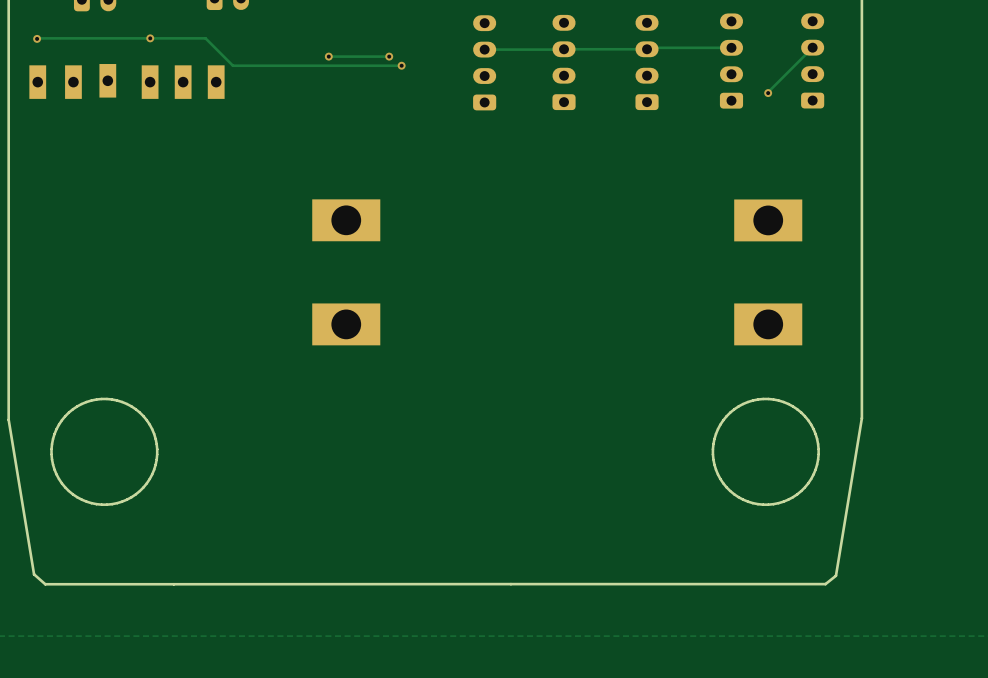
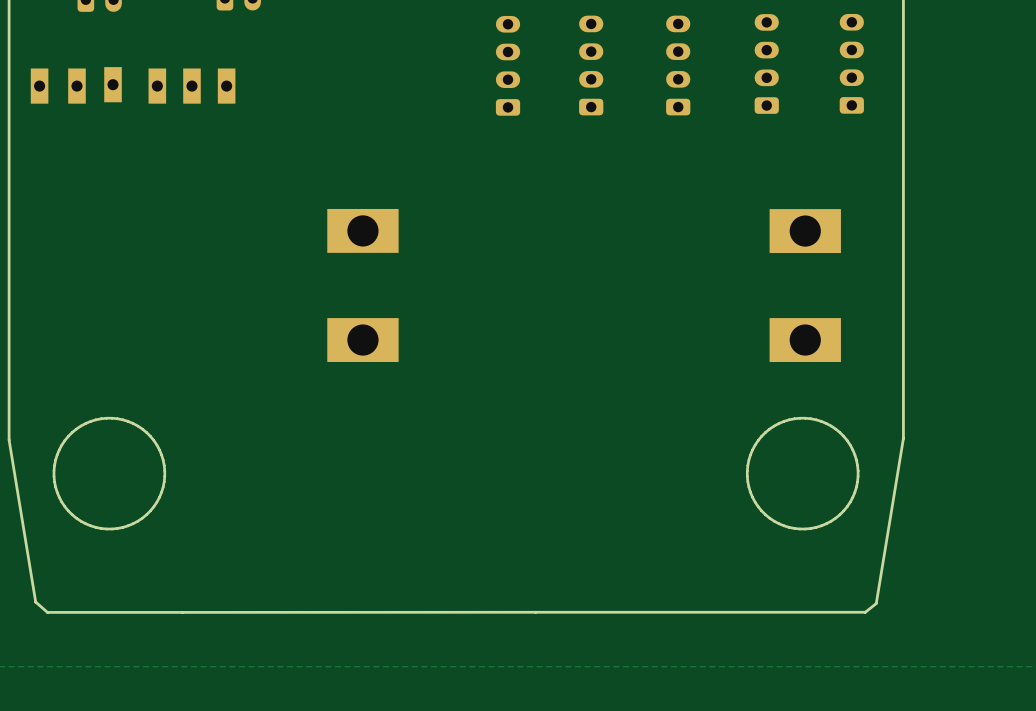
track: (37, 38) (205, 38) (232, 65) (401, 65) -> none
via: (37, 38) -> none
via: (150, 38) -> none
track: (731, 47) (484, 49) -> none
track: (812, 47) (768, 93) -> none
via: (328, 56) -> none
track: (389, 56) (328, 56) -> none
via: (389, 56) -> none
via: (401, 65) -> none
via: (768, 93) -> none

